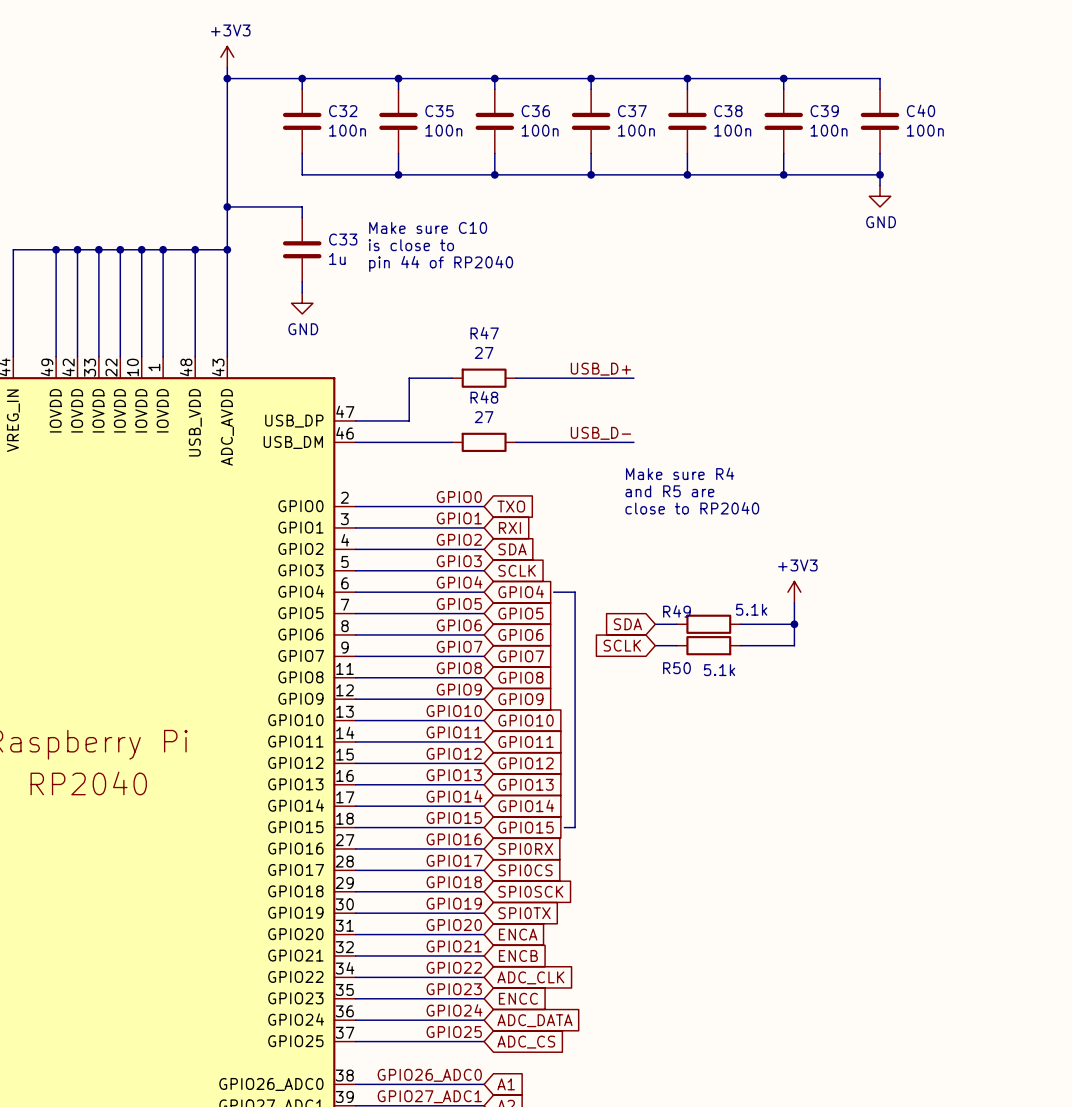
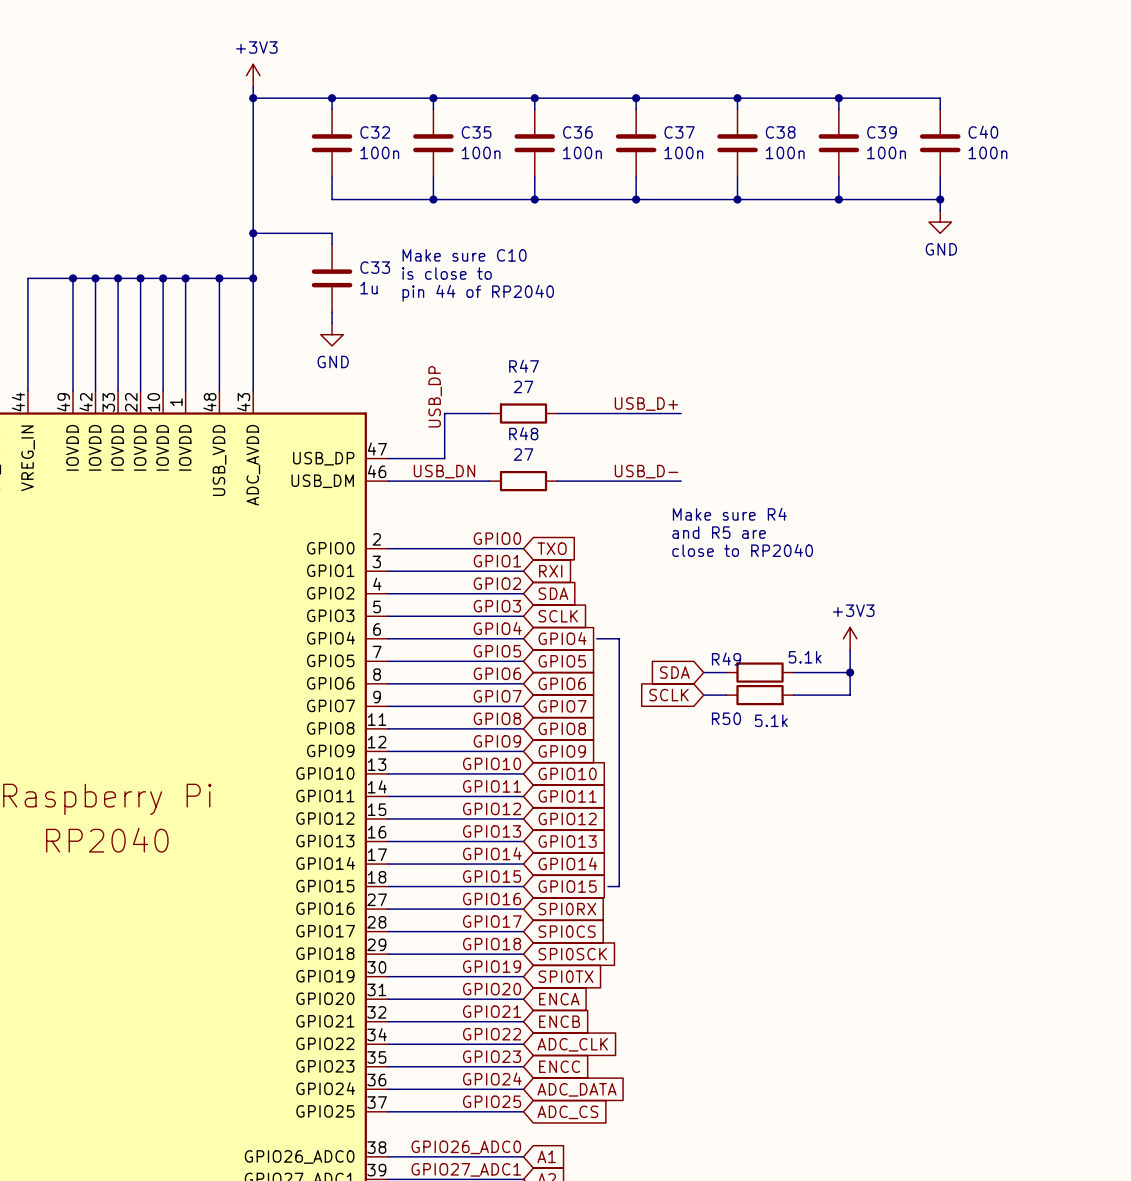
label: none -> USB_DP (435, 396)
label: none -> USB_DN (444, 471)

